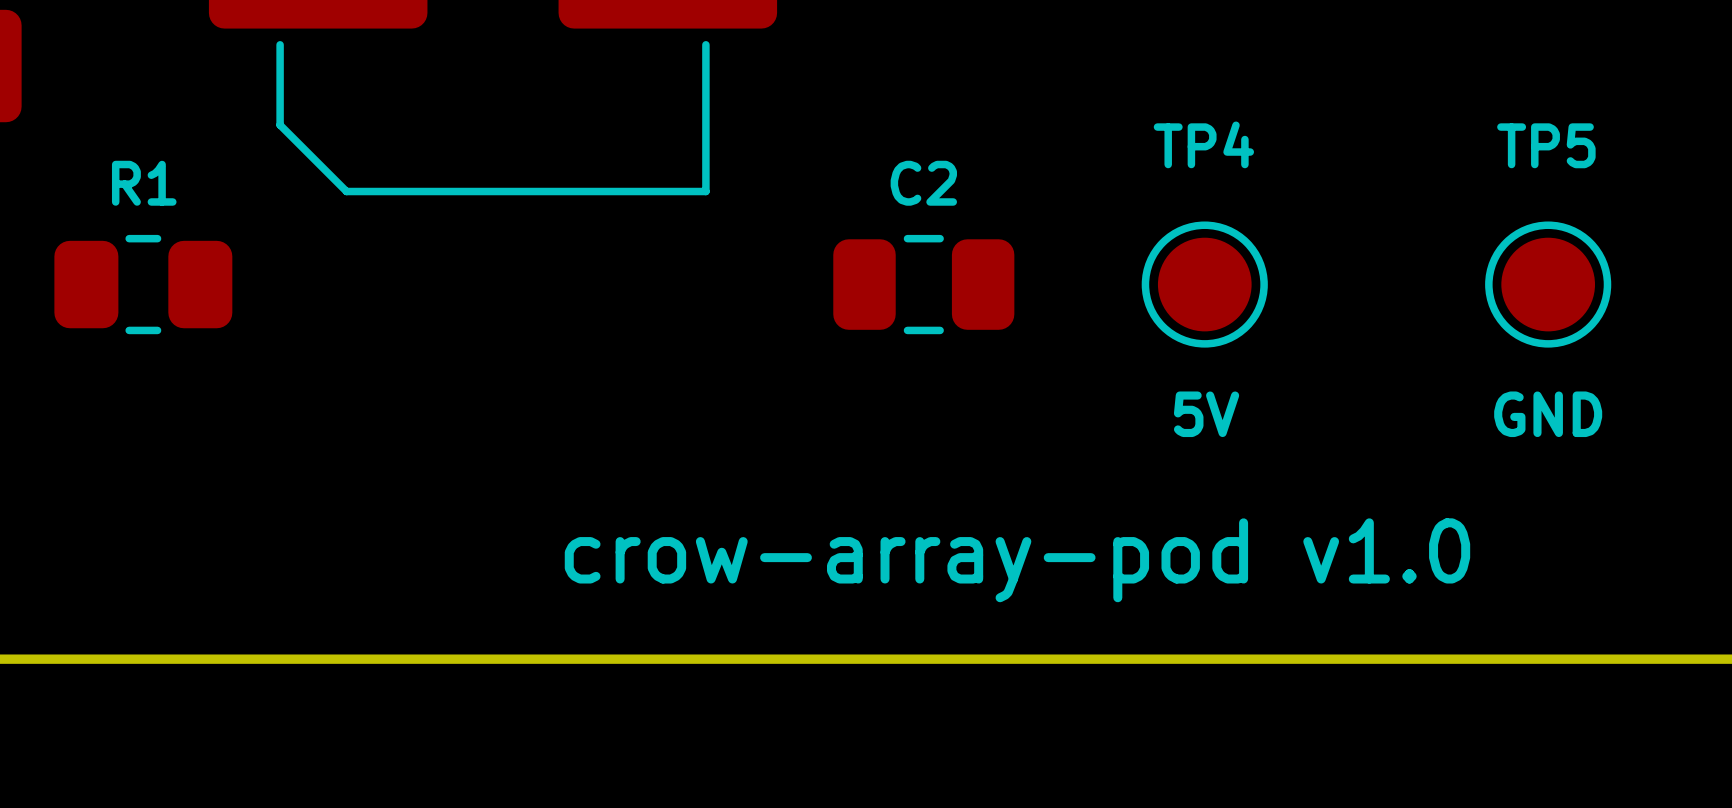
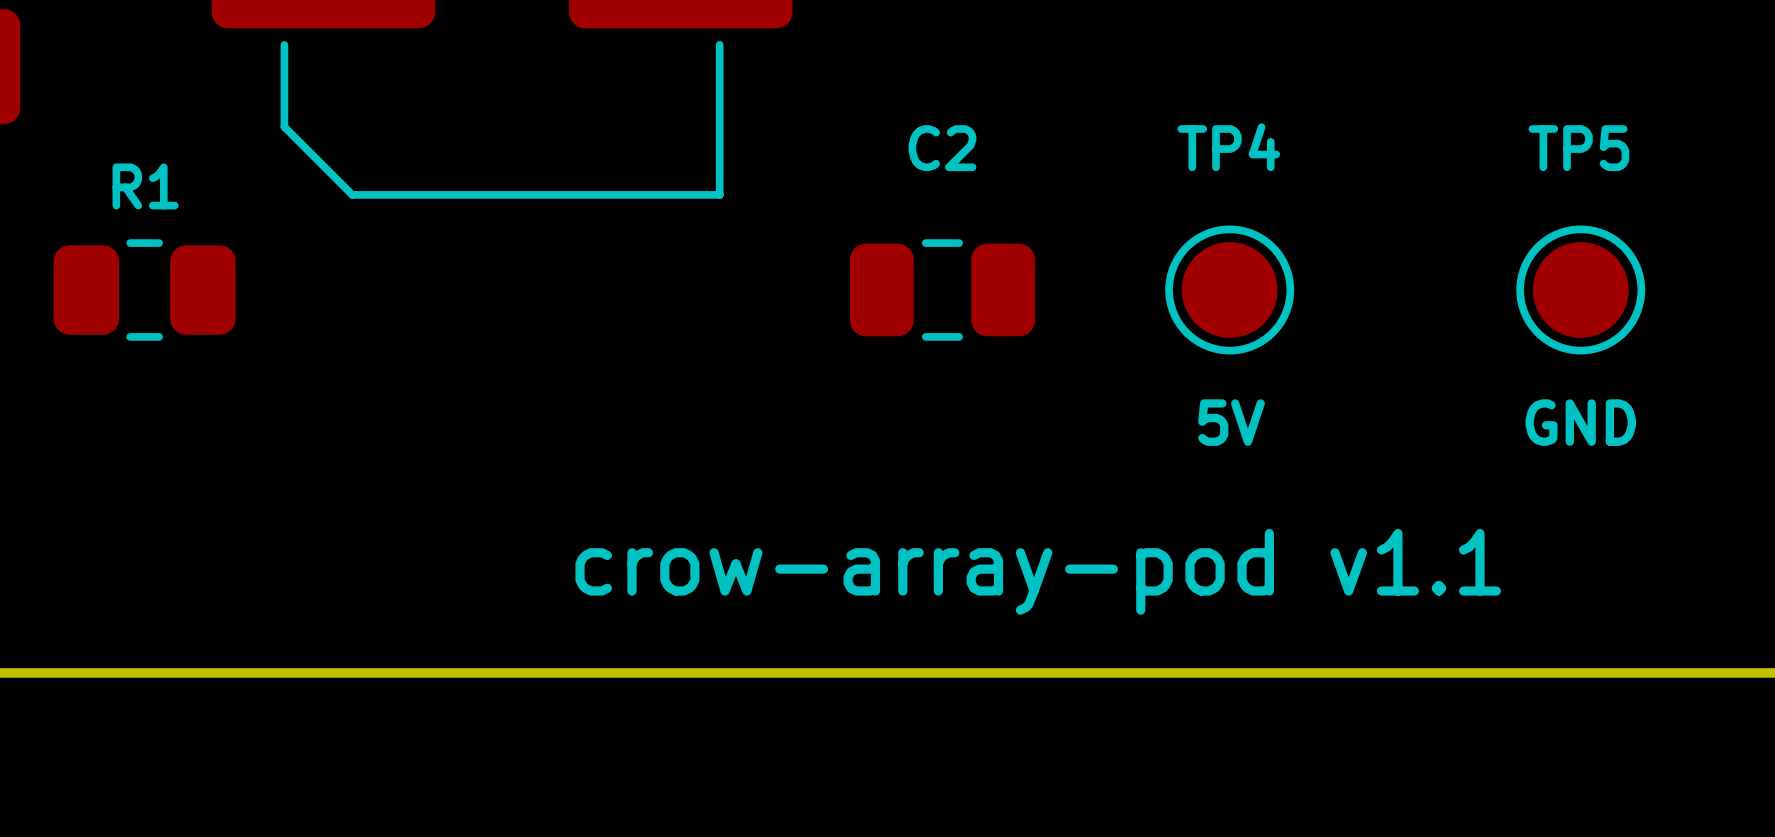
C2 name position: C2 (923, 183) -> C2 (942, 148)
text: crow-array-pod v1.0 (1017, 560) -> crow-array-pod v1.1 (1038, 571)

